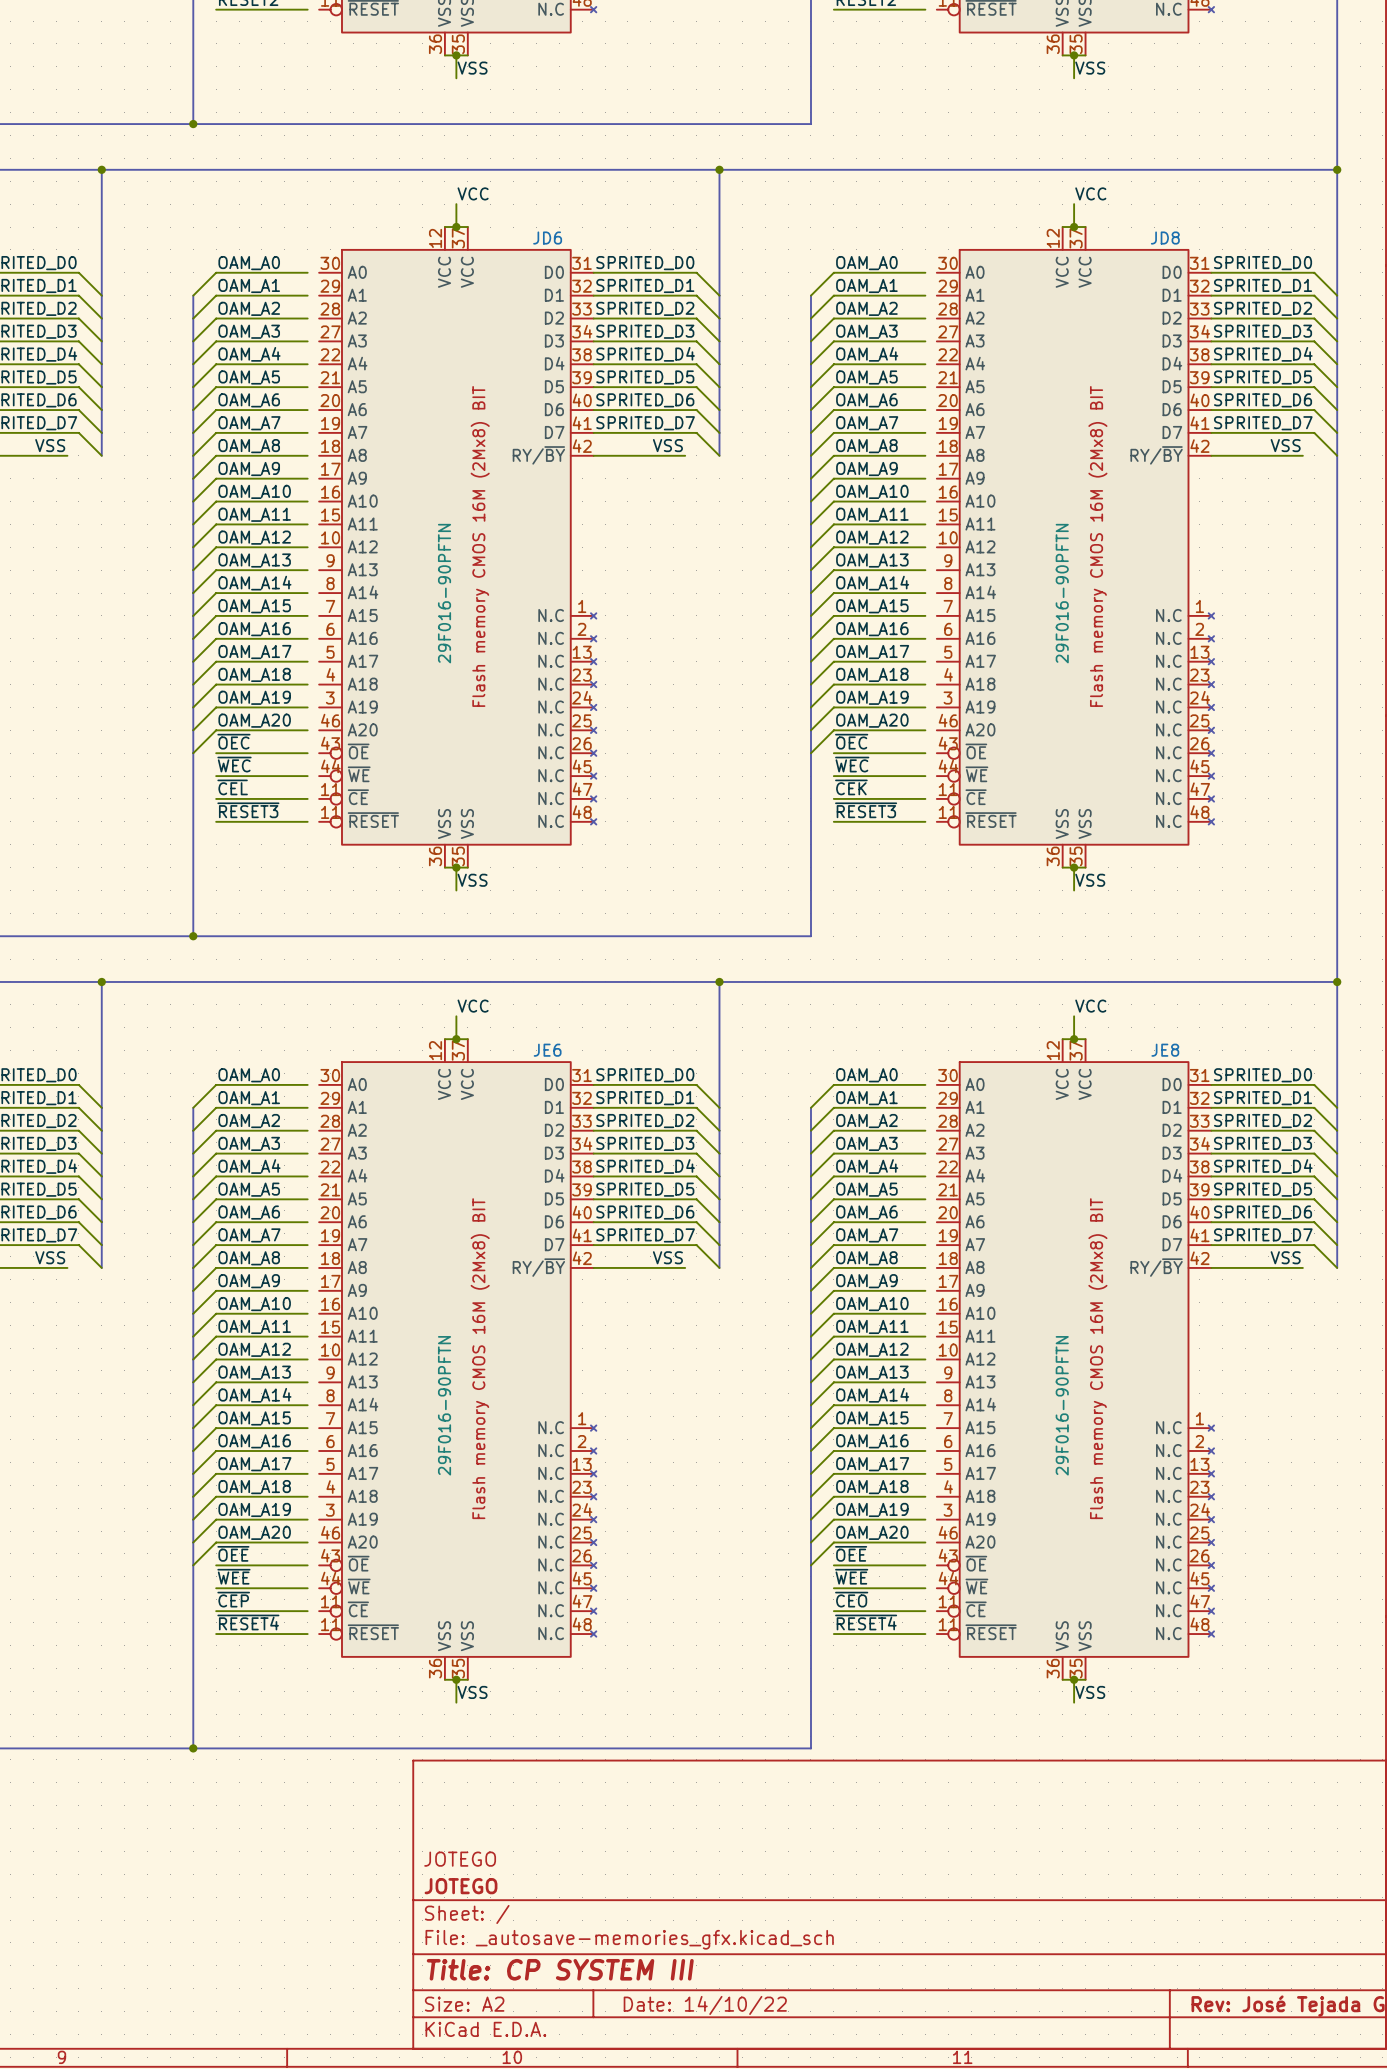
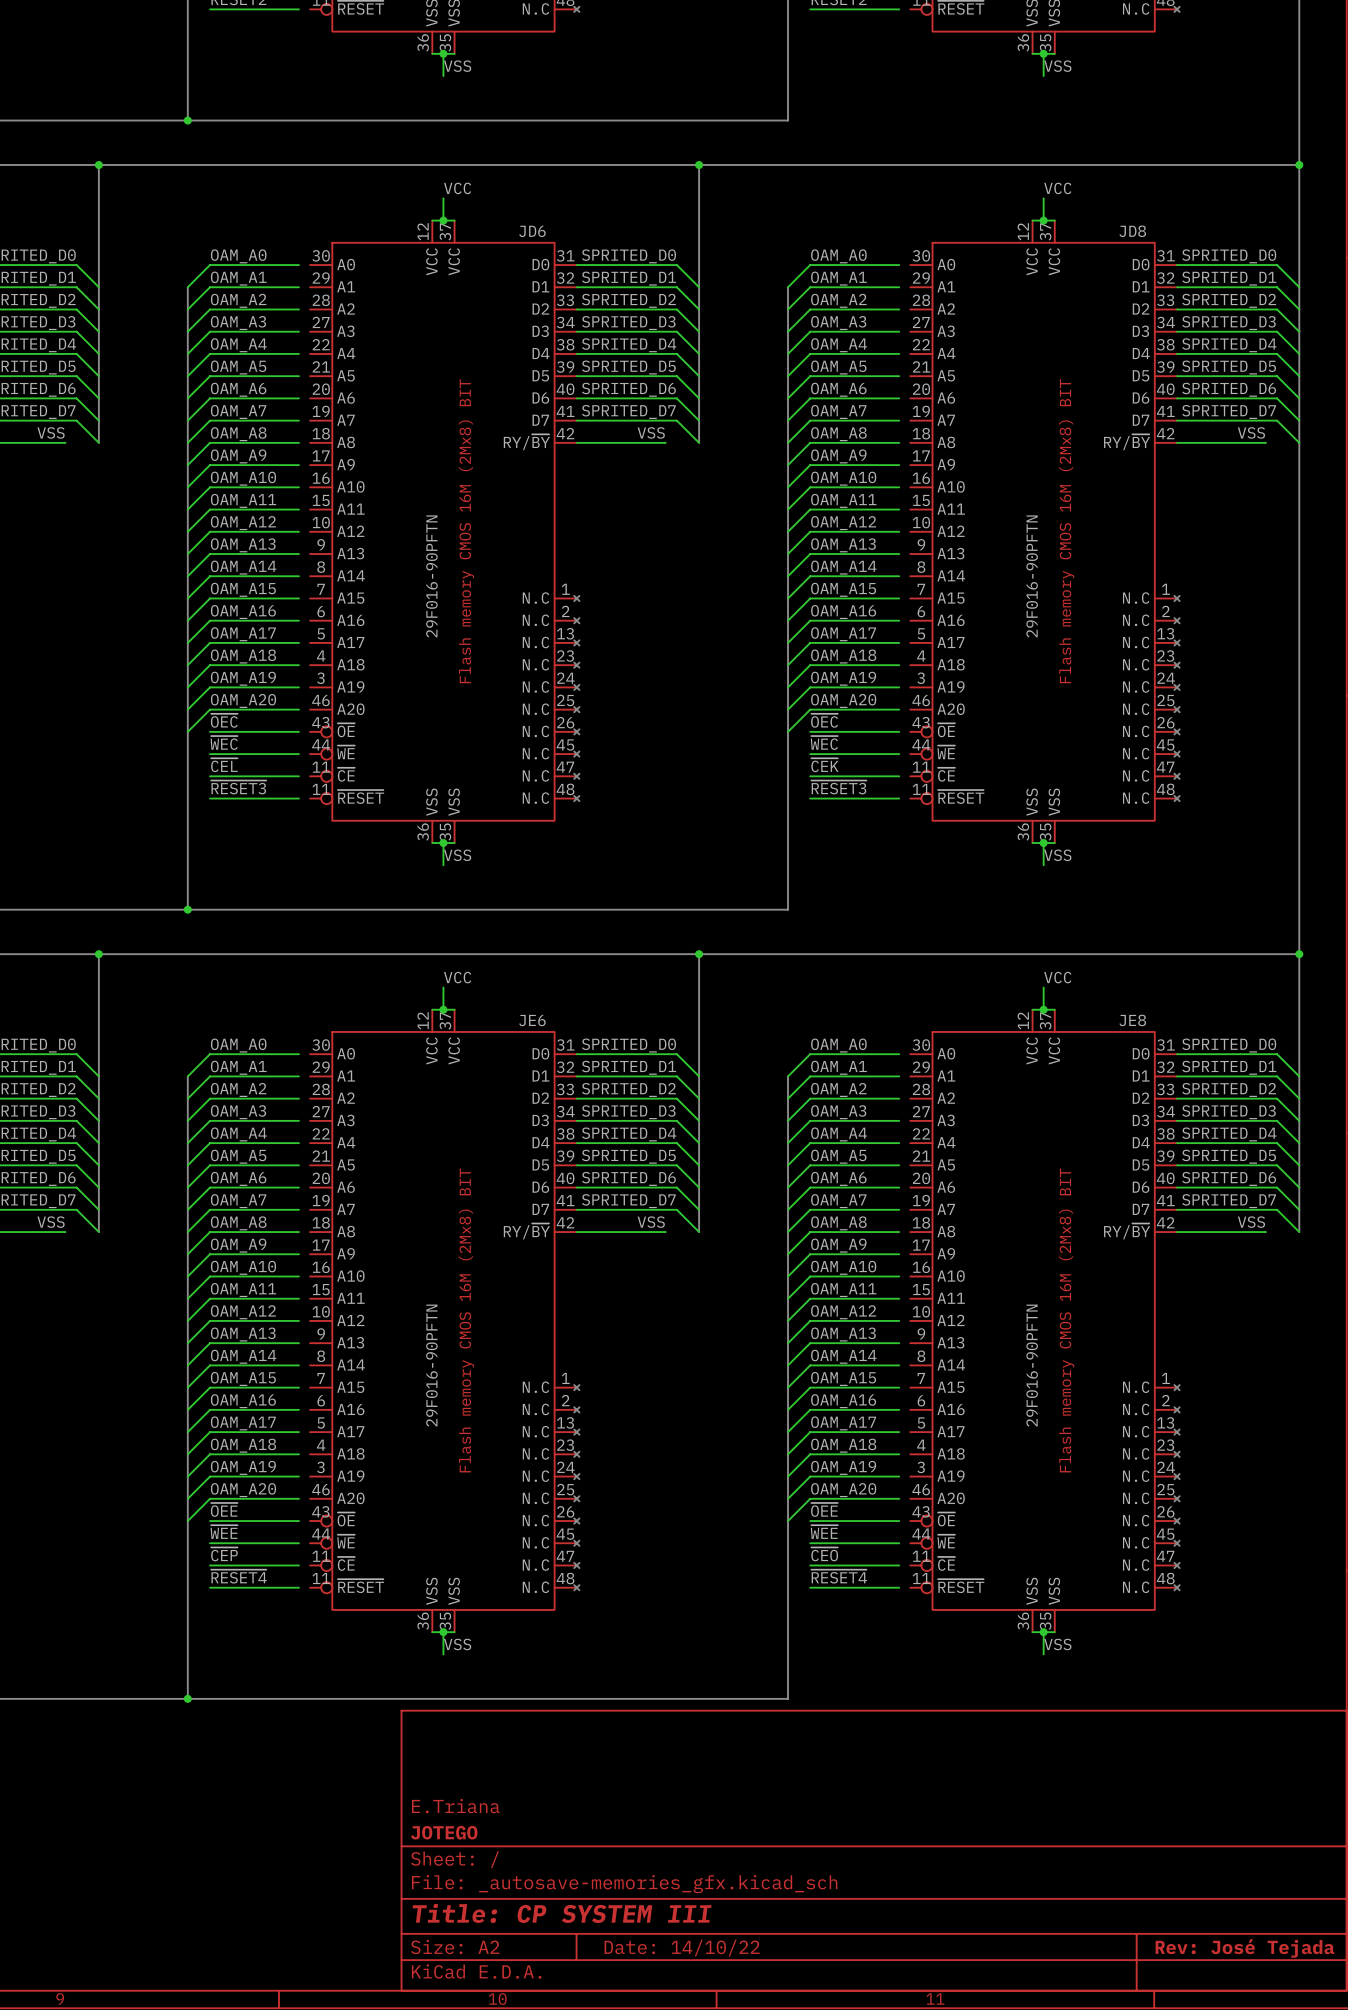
title block: JOTEGO (460, 1859) -> E.Triana (455, 1806)

